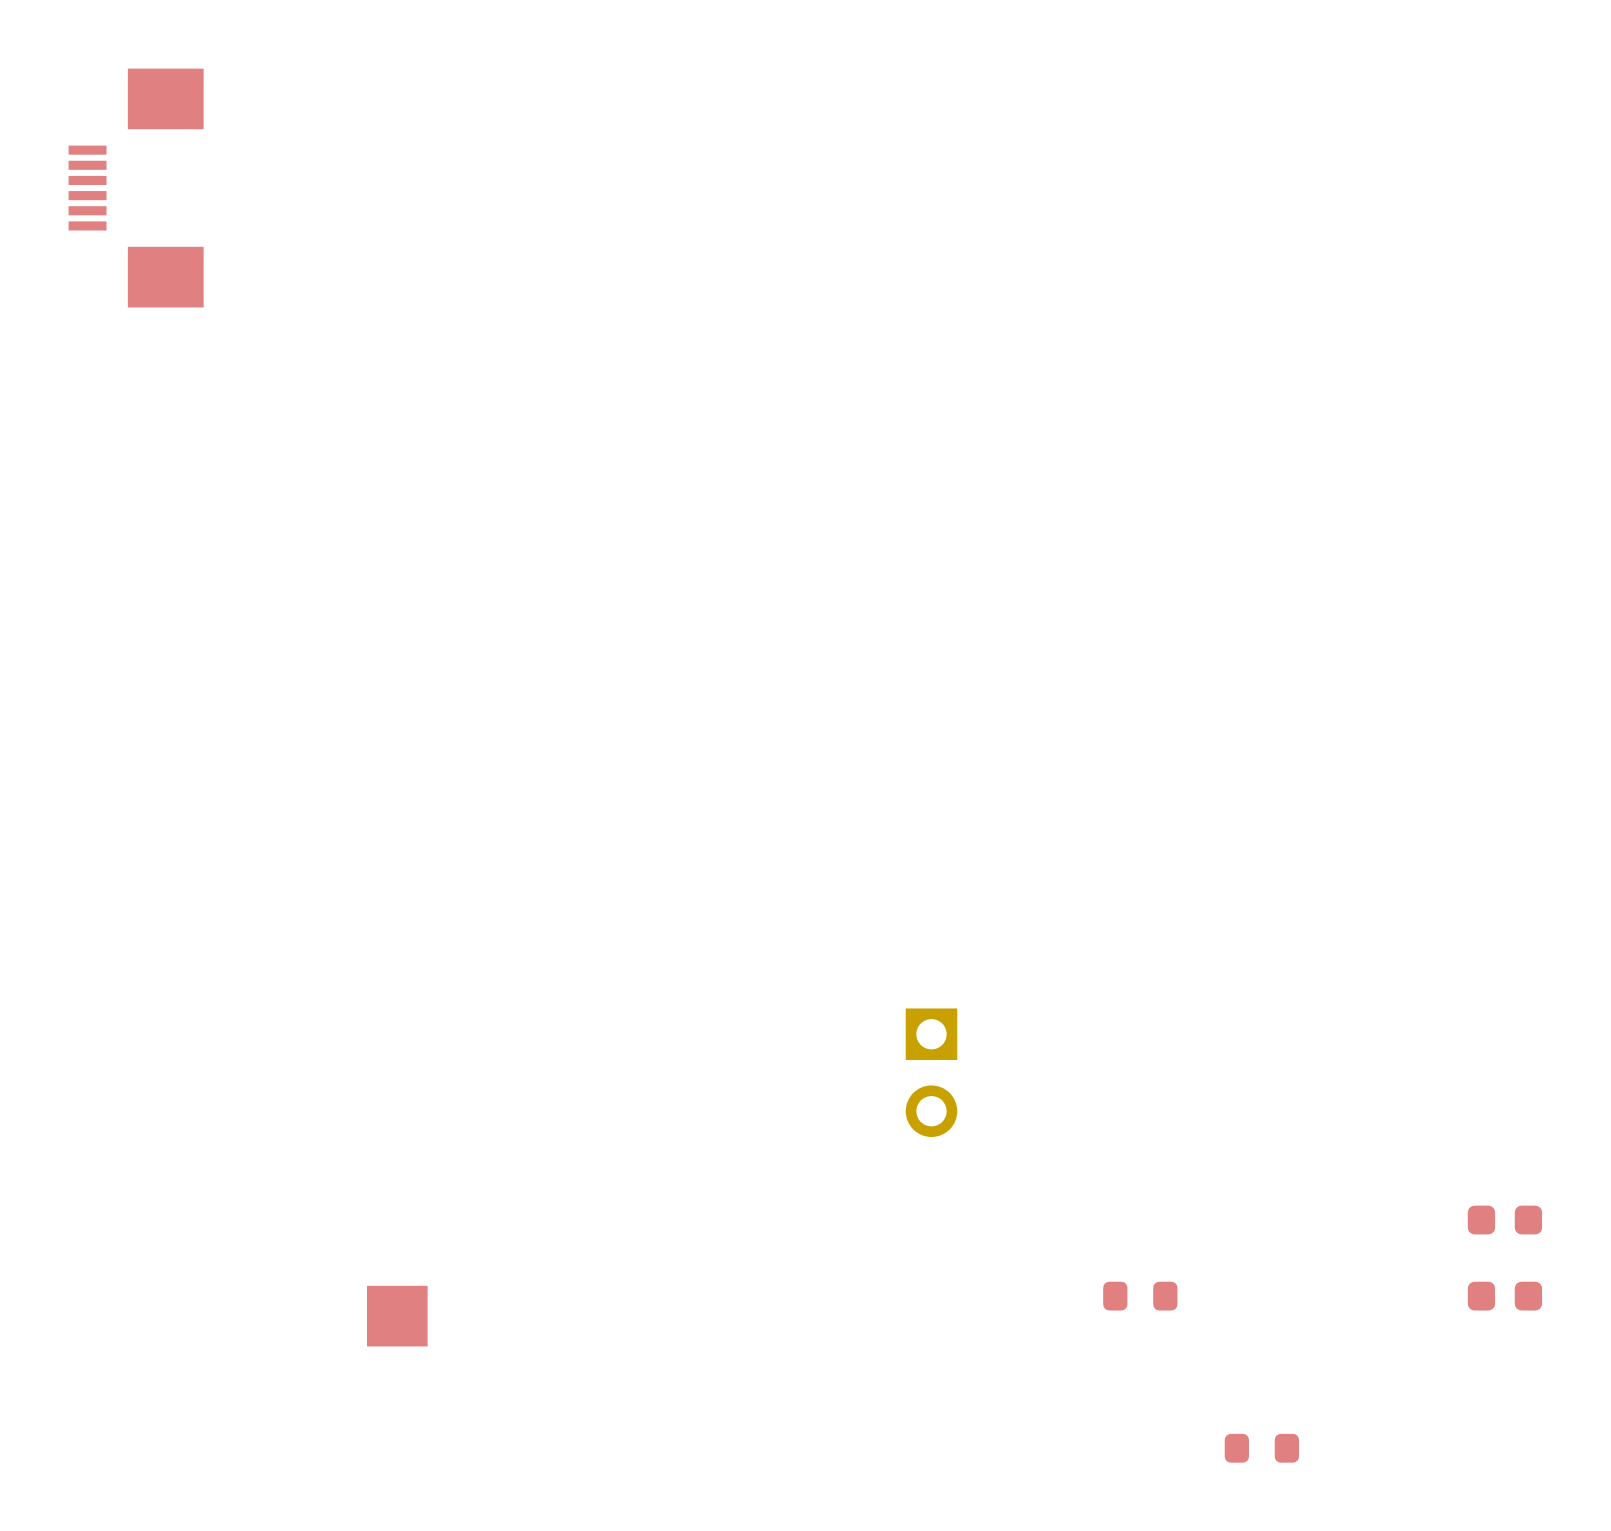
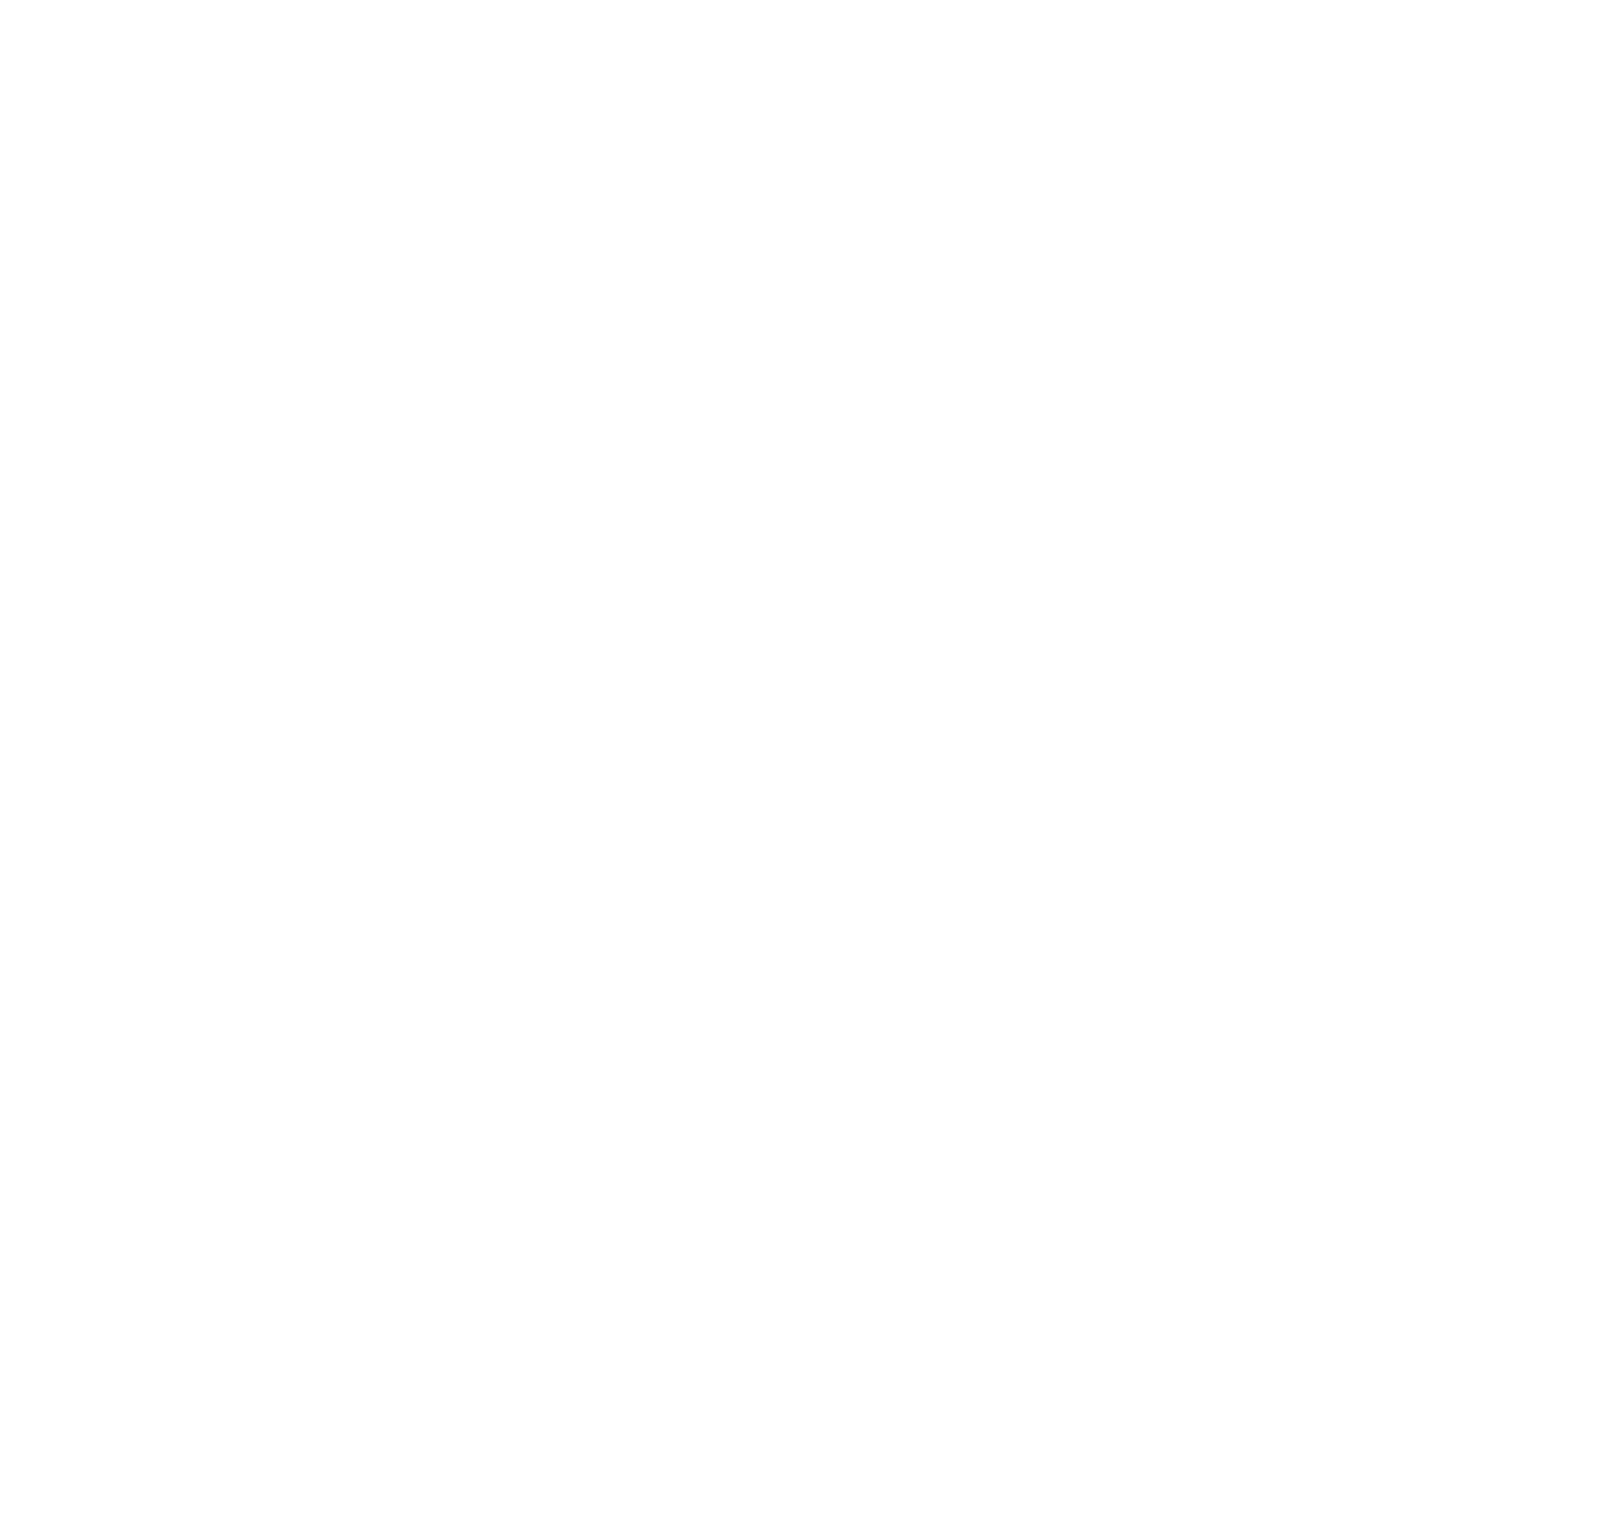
part: (136, 188) -> none
part: (931, 1072) -> none
part: (1504, 1220) -> none
part: (1140, 1296) -> none
part: (1504, 1296) -> none
part: (397, 1316) -> none
part: (1261, 1448) -> none

